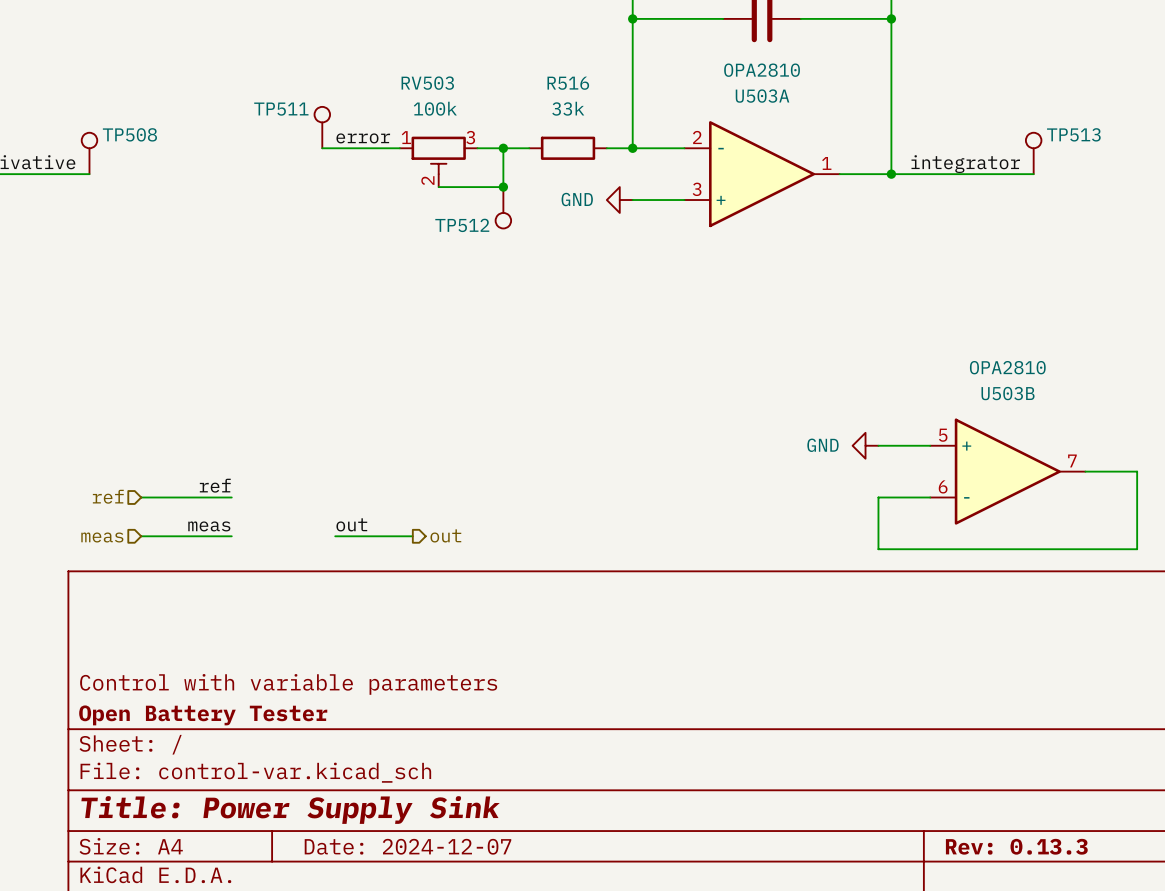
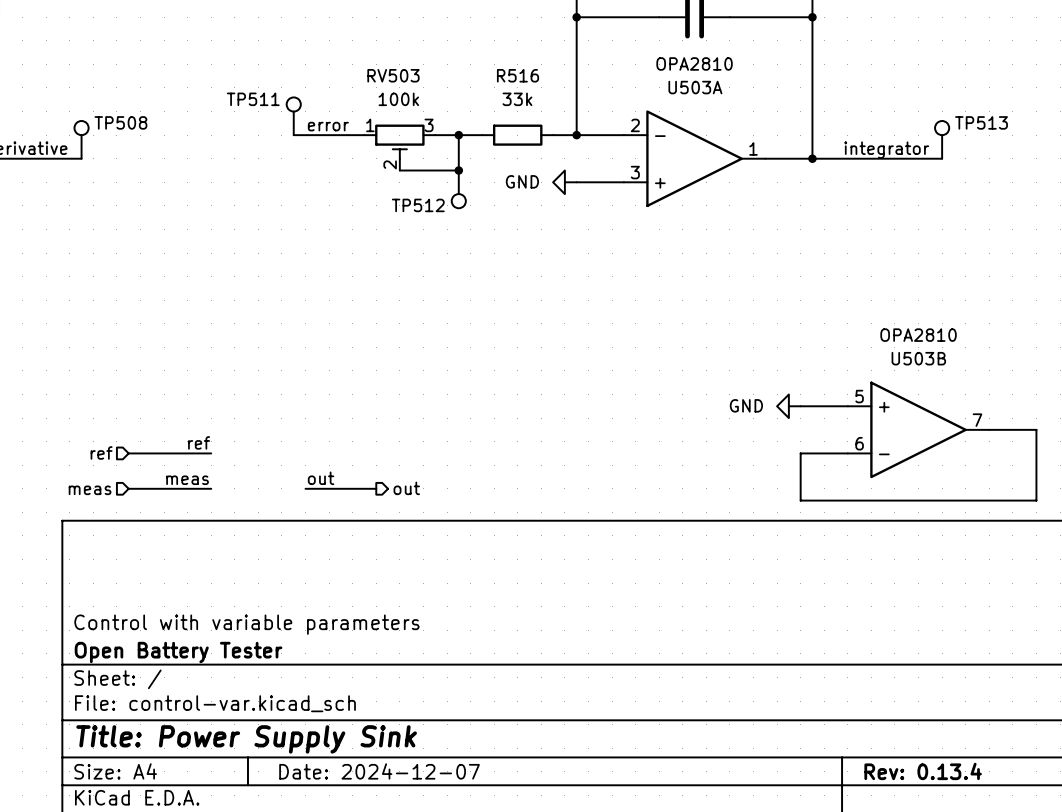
title block: Rev: 0.13.3 (1016, 846) -> Rev: 0.13.4 (923, 771)

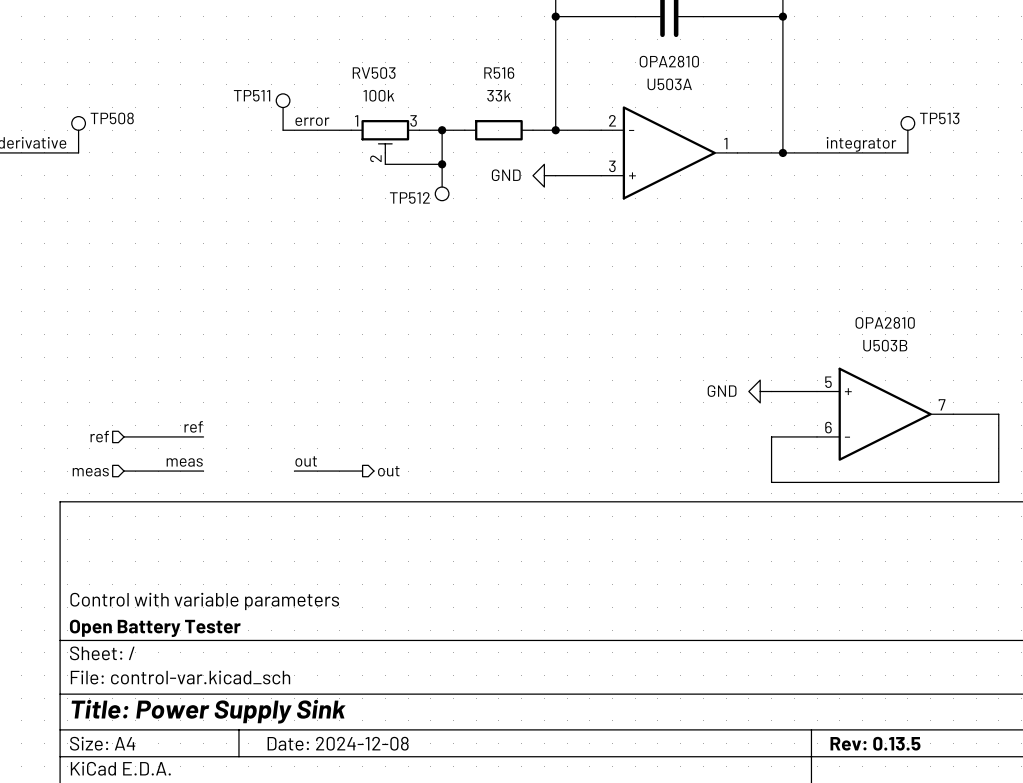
title block: Date: 2024-12-07 (379, 771) -> Date: 2024-12-08 (338, 743)
title block: Rev: 0.13.4 (923, 771) -> Rev: 0.13.5 (875, 743)

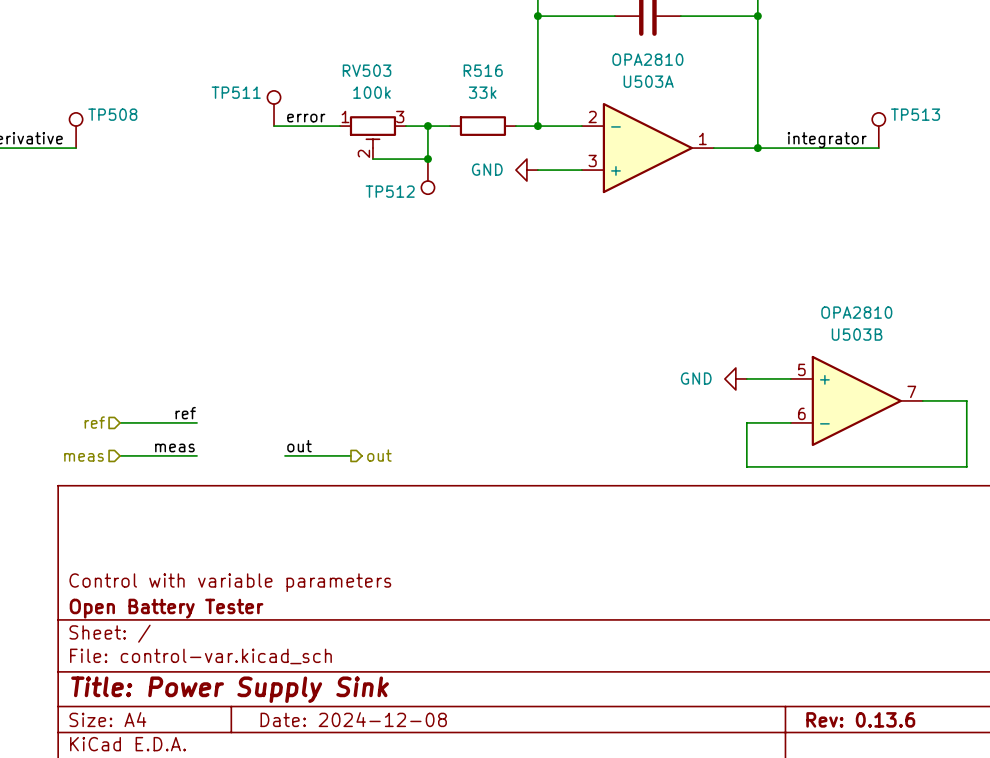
title block: Rev: 0.13.5 (875, 743) -> Rev: 0.13.6 (860, 719)

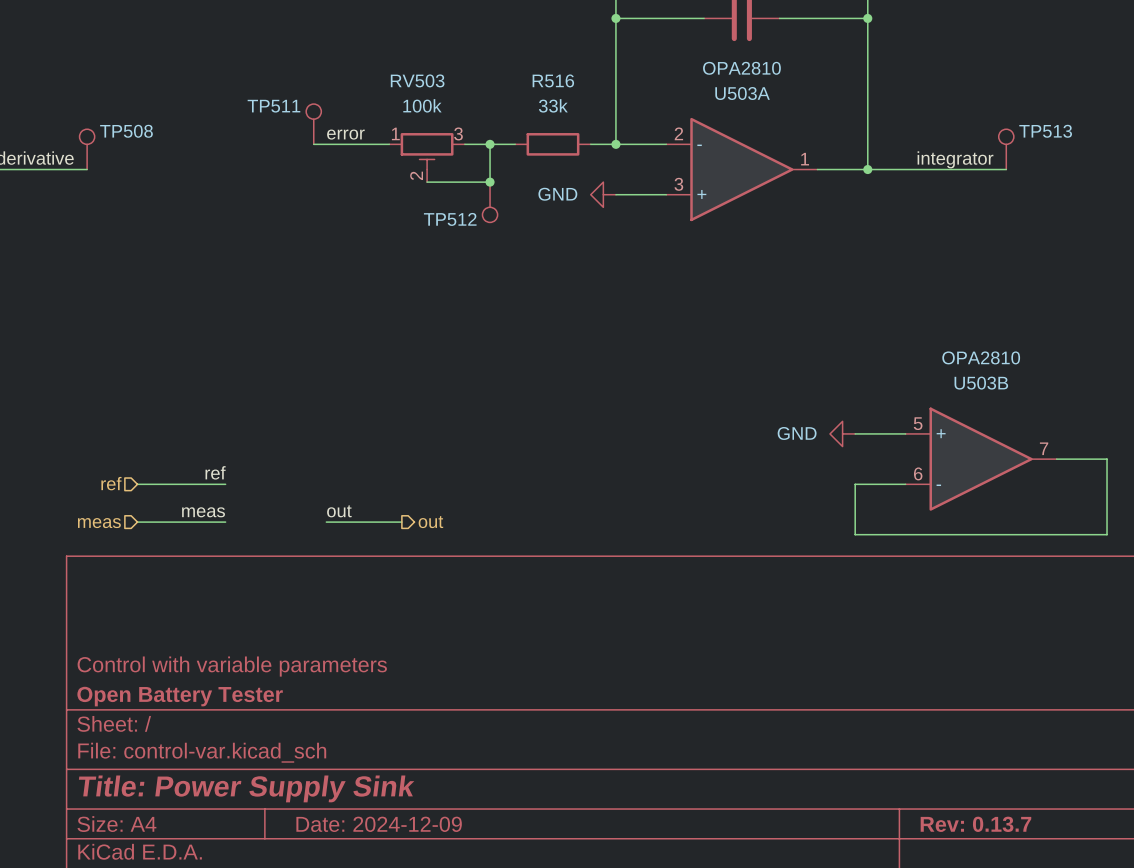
title block: Date: 2024-12-08 (353, 719) -> Date: 2024-12-09 (379, 824)
title block: Rev: 0.13.6 (860, 719) -> Rev: 0.13.7 (975, 824)

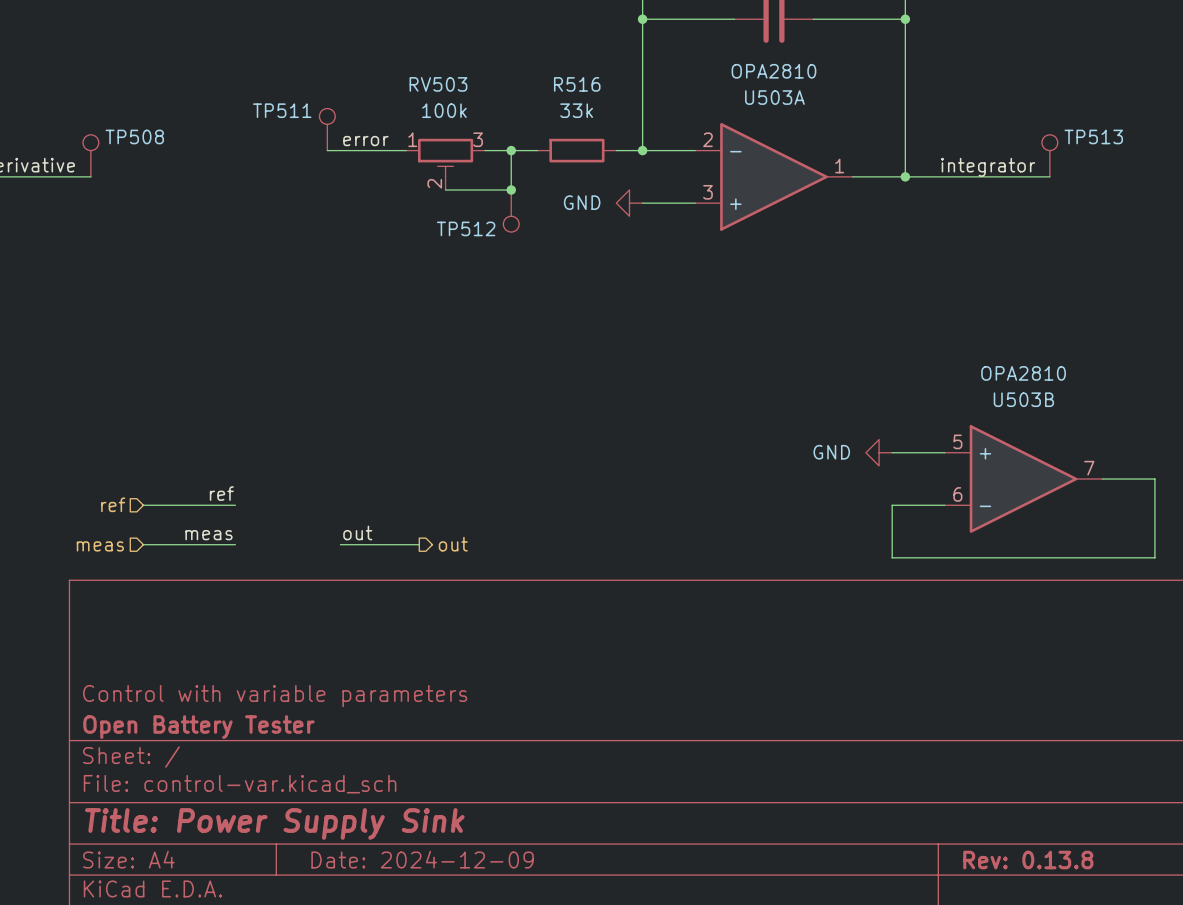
title block: Rev: 0.13.7 (975, 824) -> Rev: 0.13.8 (1028, 860)

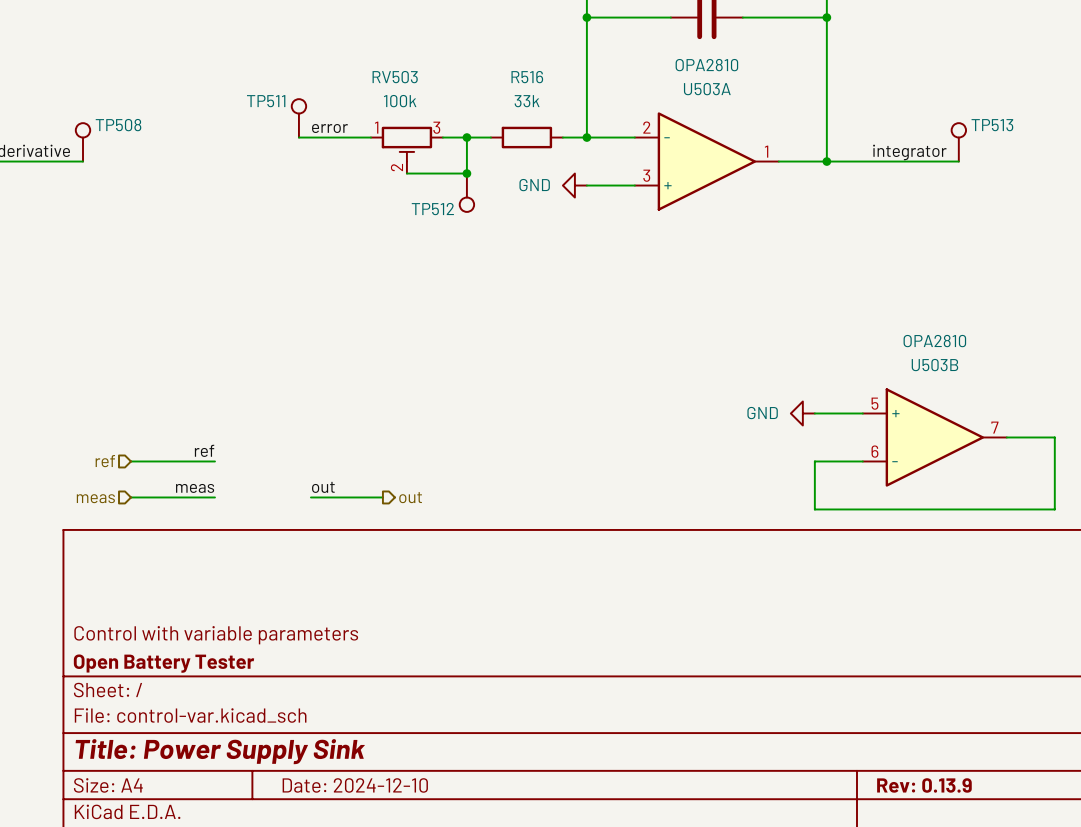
title block: Date: 2024-12-09 (422, 859) -> Date: 2024-12-10 (355, 785)
title block: Rev: 0.13.8 (1028, 860) -> Rev: 0.13.9 (924, 785)

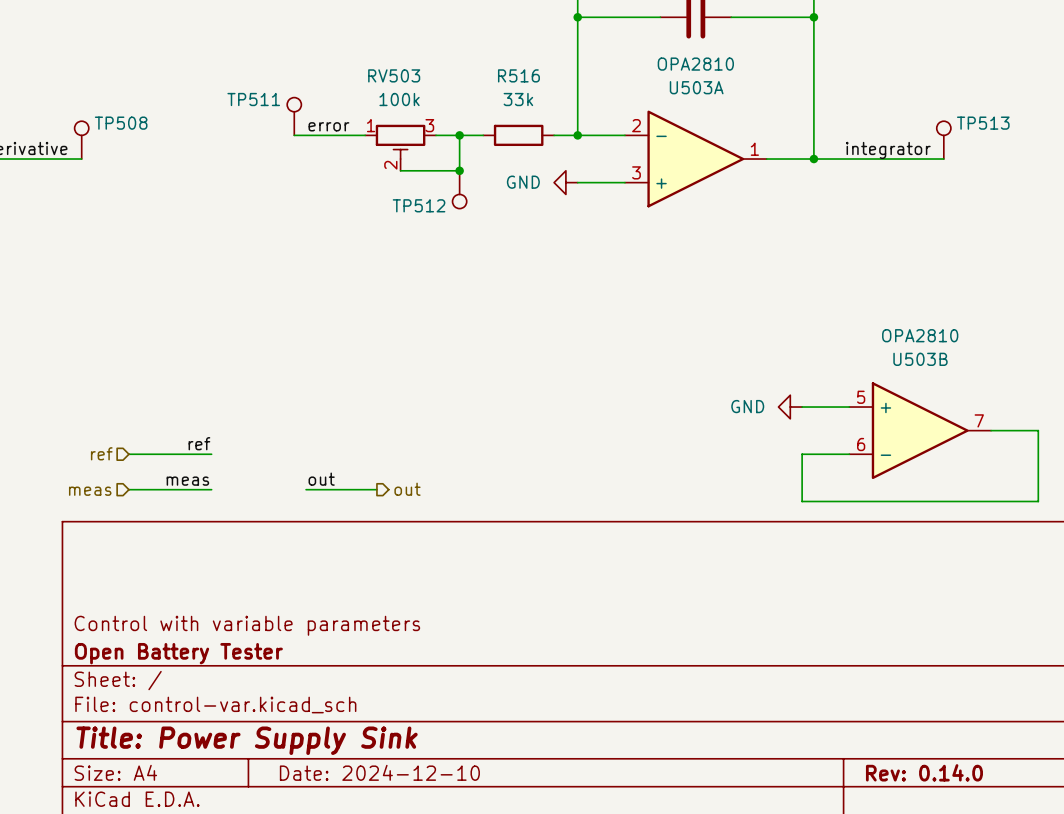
title block: Rev: 0.13.9 (924, 785) -> Rev: 0.14.0 (924, 772)

